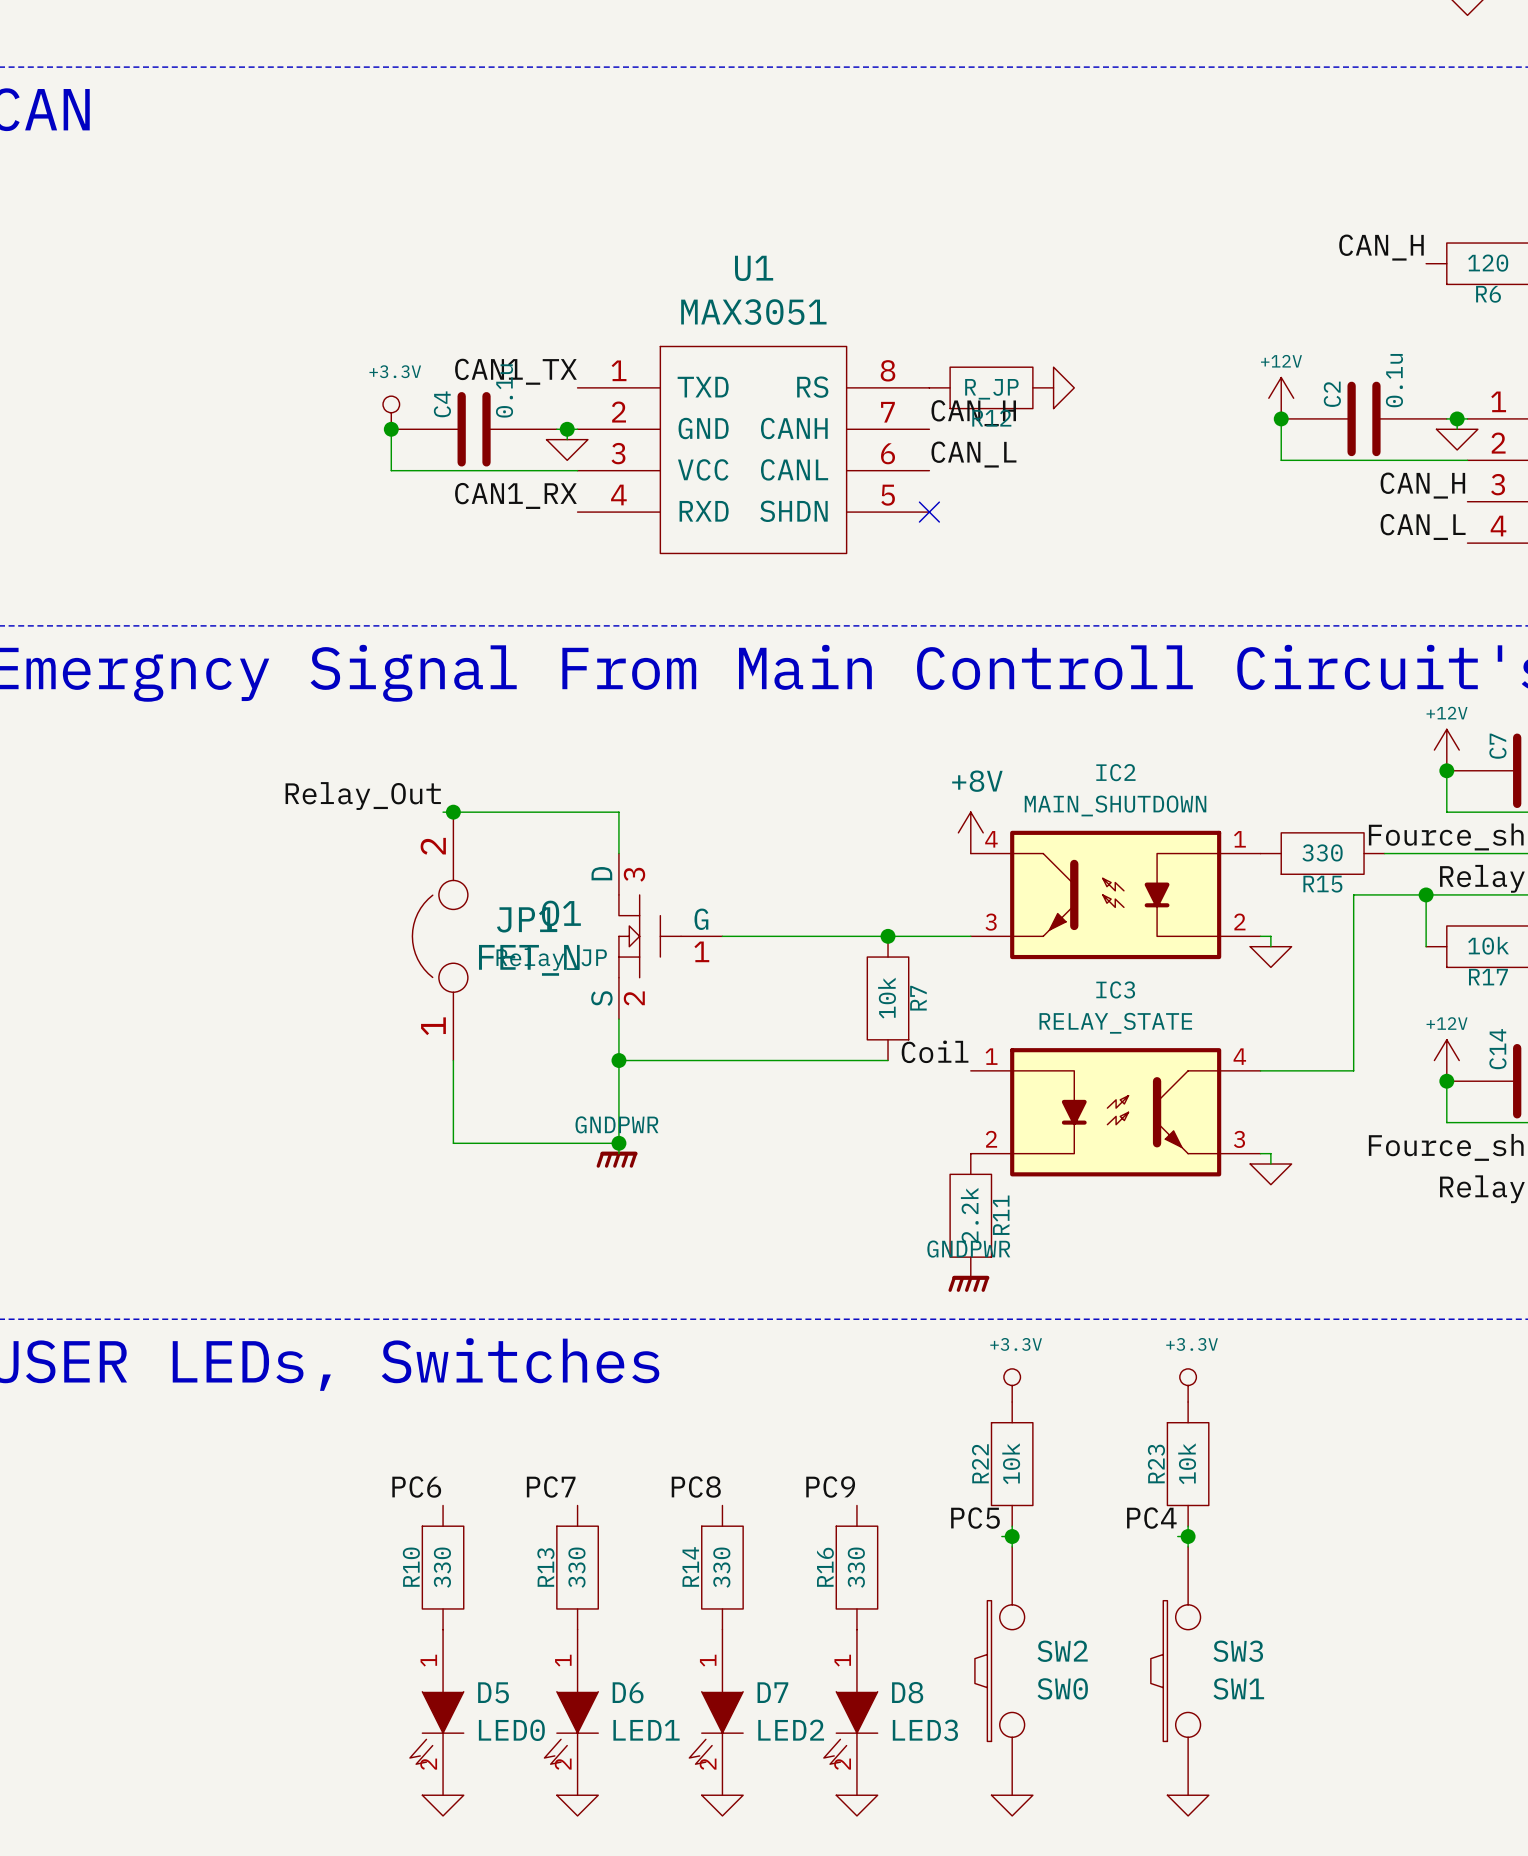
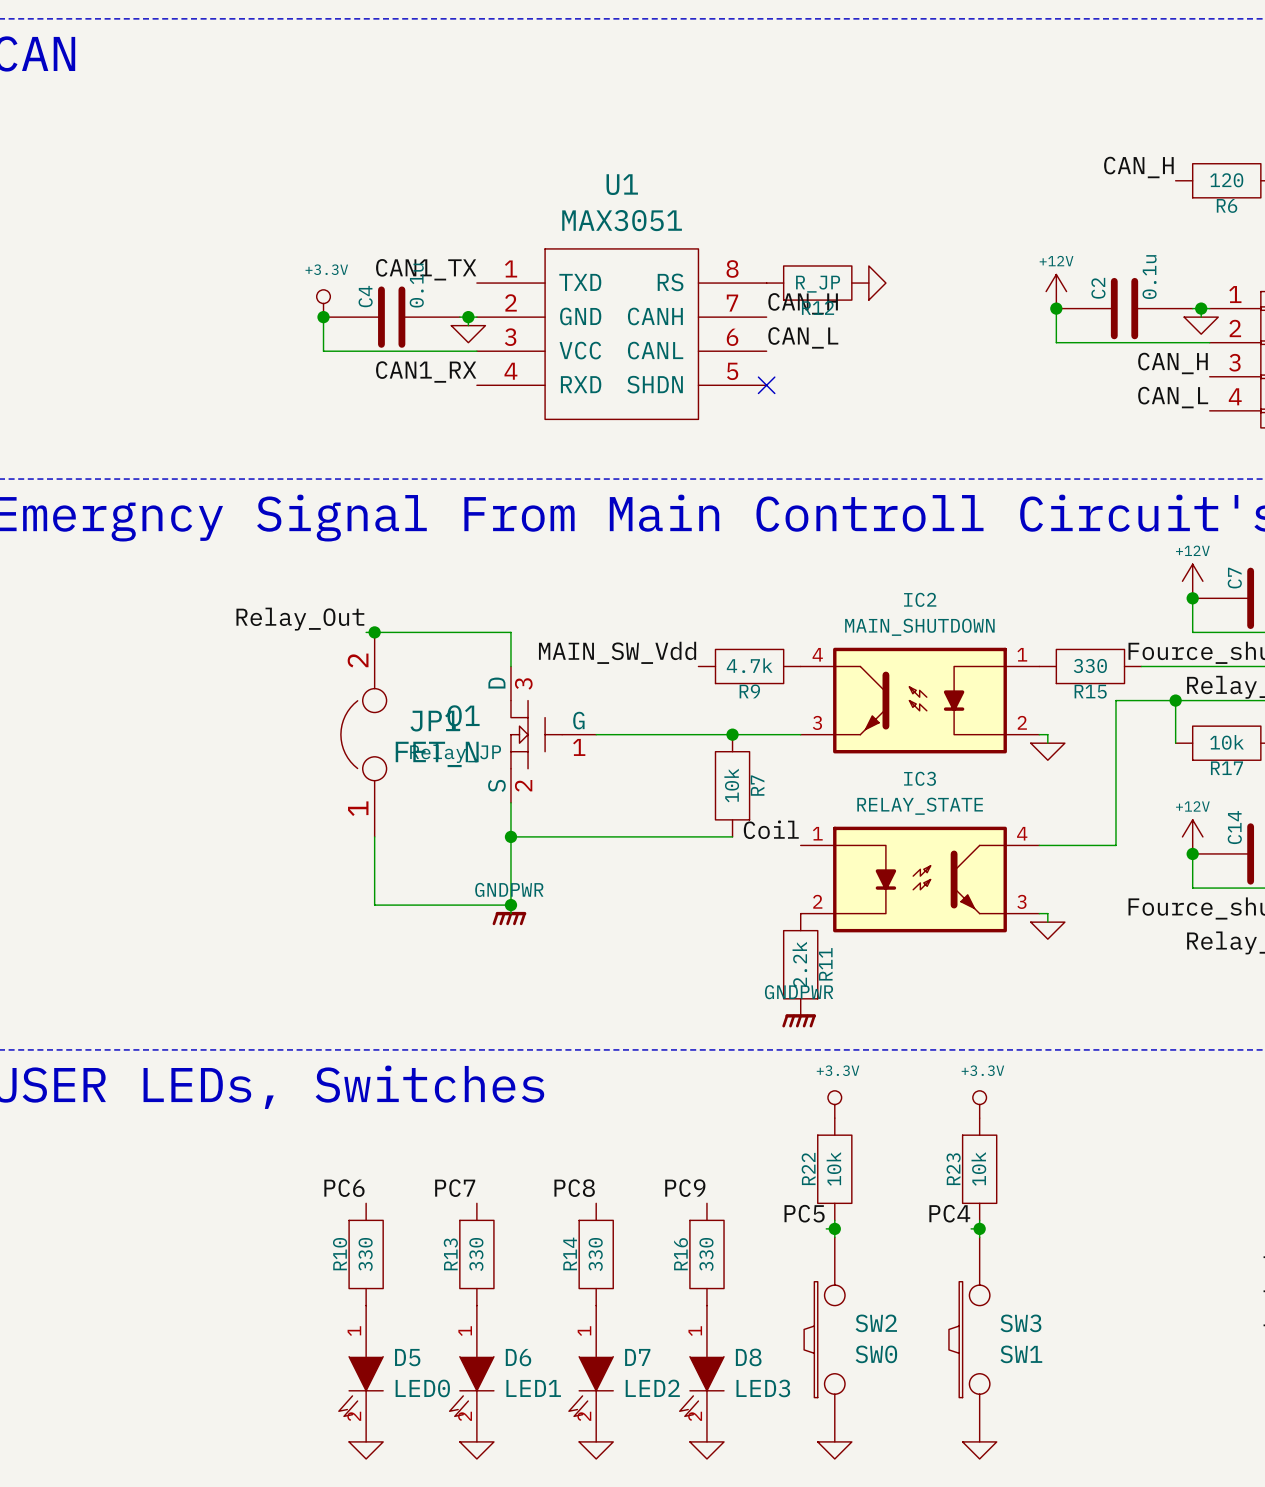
power symbol: +8V (970, 832) -> none
label: none -> MAIN_SW_Vdd (617, 652)
R9: none -> 4.7k (749, 666)

